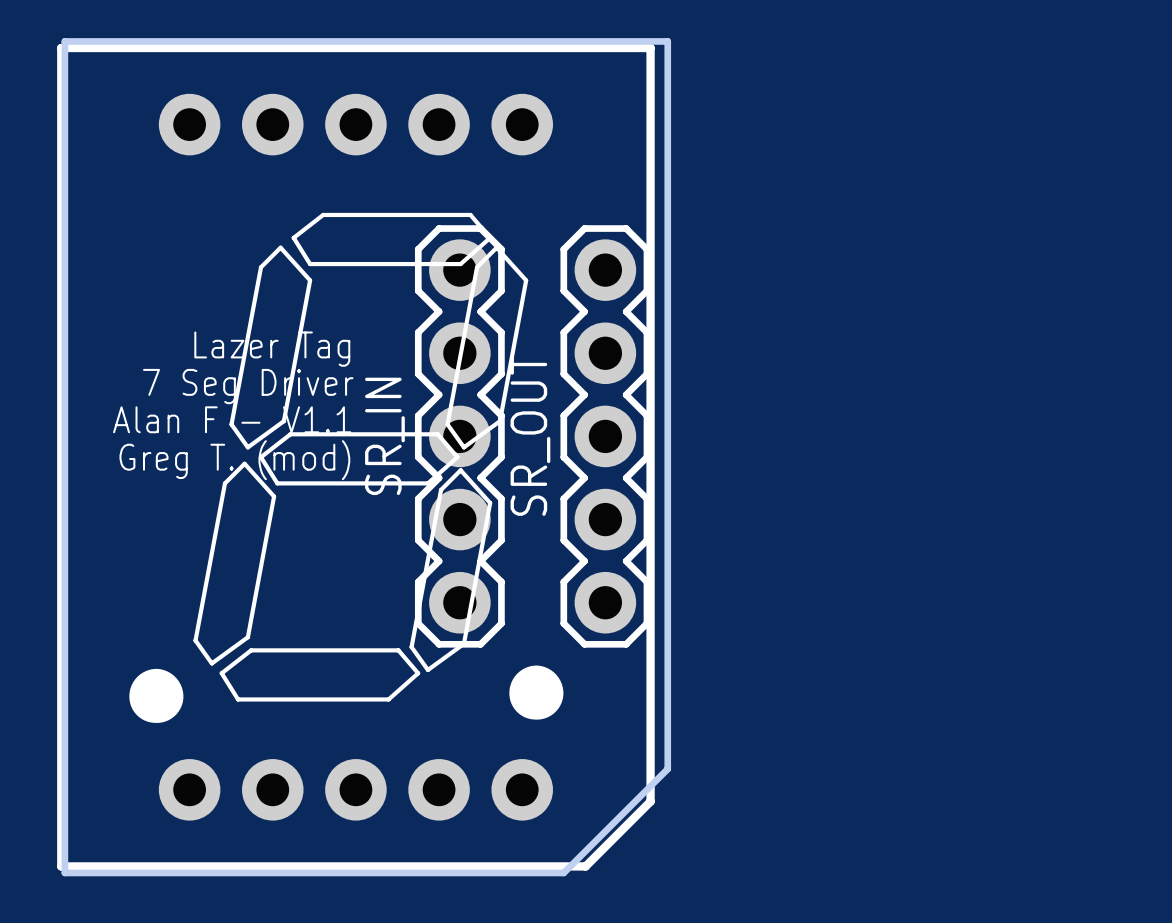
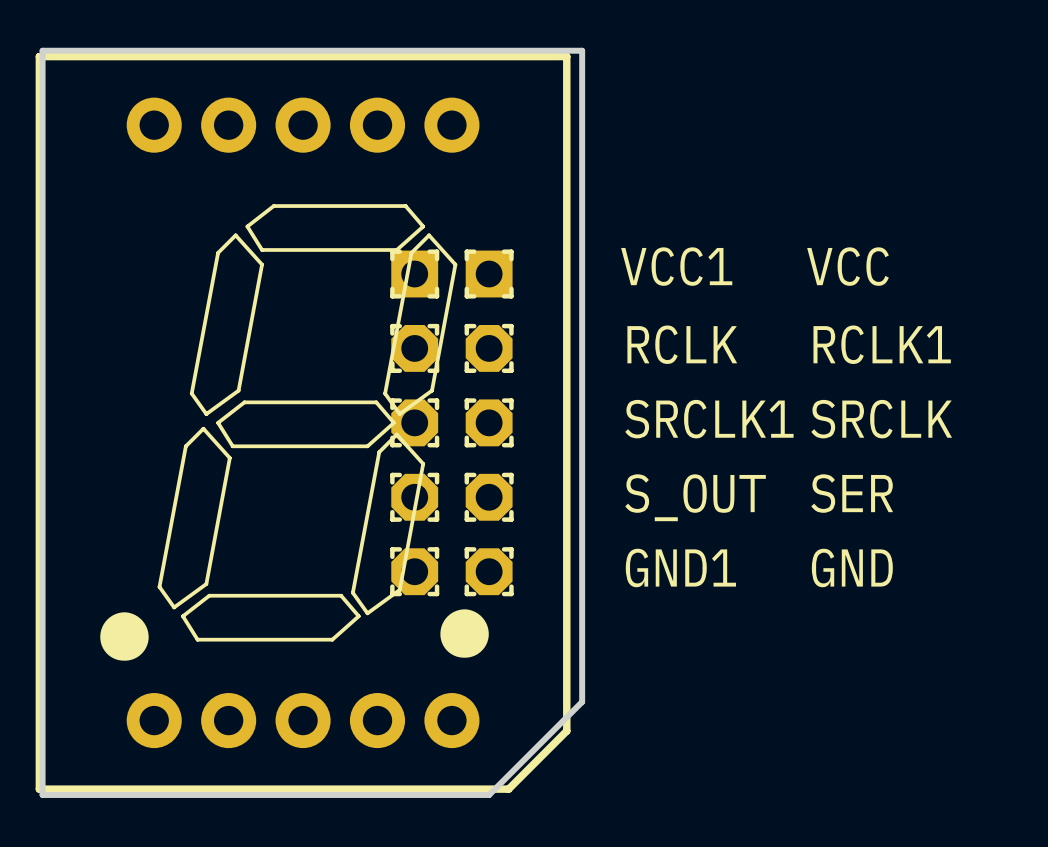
VCC1: none -> (414, 274)
VCC: none -> (489, 274)
text: Lazer Tag (272, 349) -> none
RCLK: none -> (414, 348)
RCLK1: none -> (489, 348)
text: 7 Seg Driver (248, 386) -> none
text: Alan F - V1.1 (232, 419) -> none
SR_IN: (459, 436) -> none
SR_OUT: (605, 436) -> none
SRCLK1: none -> (414, 422)
SRCLK: none -> (489, 422)
text: Greg T. (mod) (234, 460) -> none
S_OUT: none -> (414, 497)
SER: none -> (489, 497)
GND1: none -> (414, 571)
GND: none -> (489, 571)

